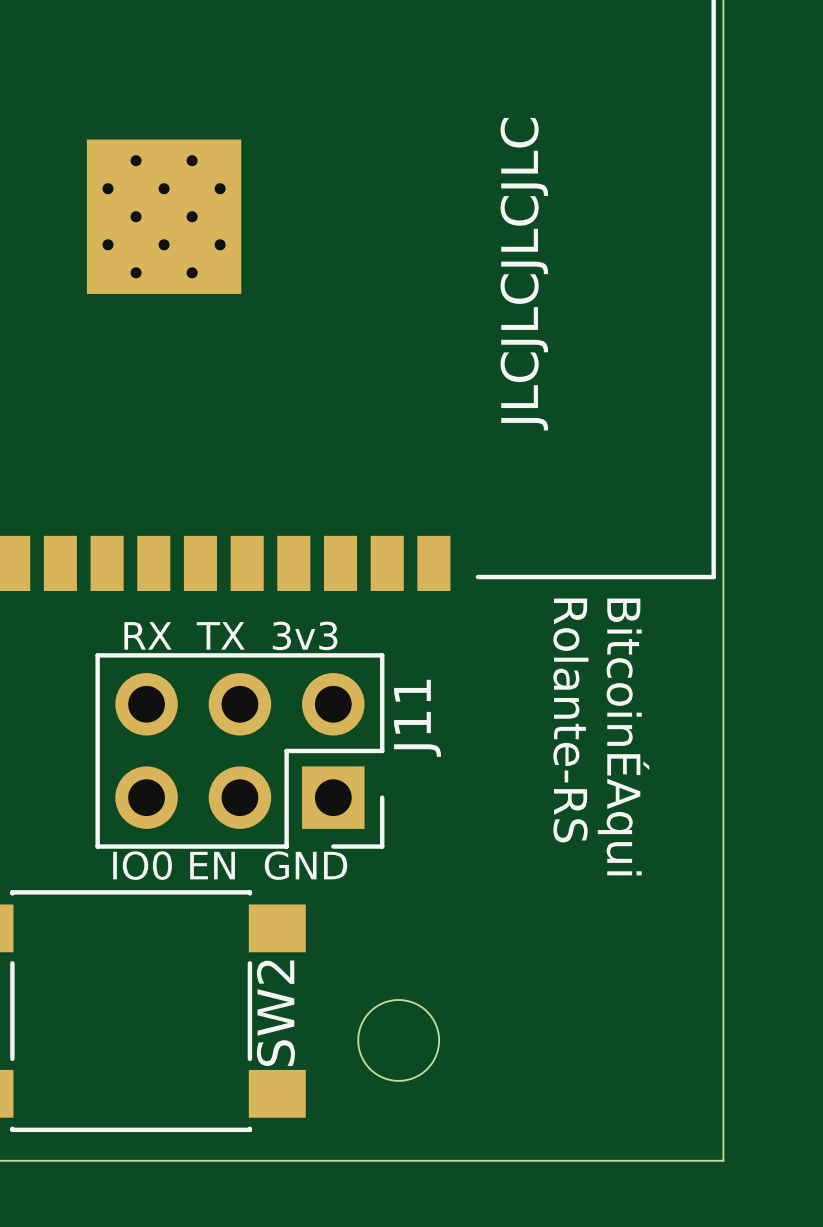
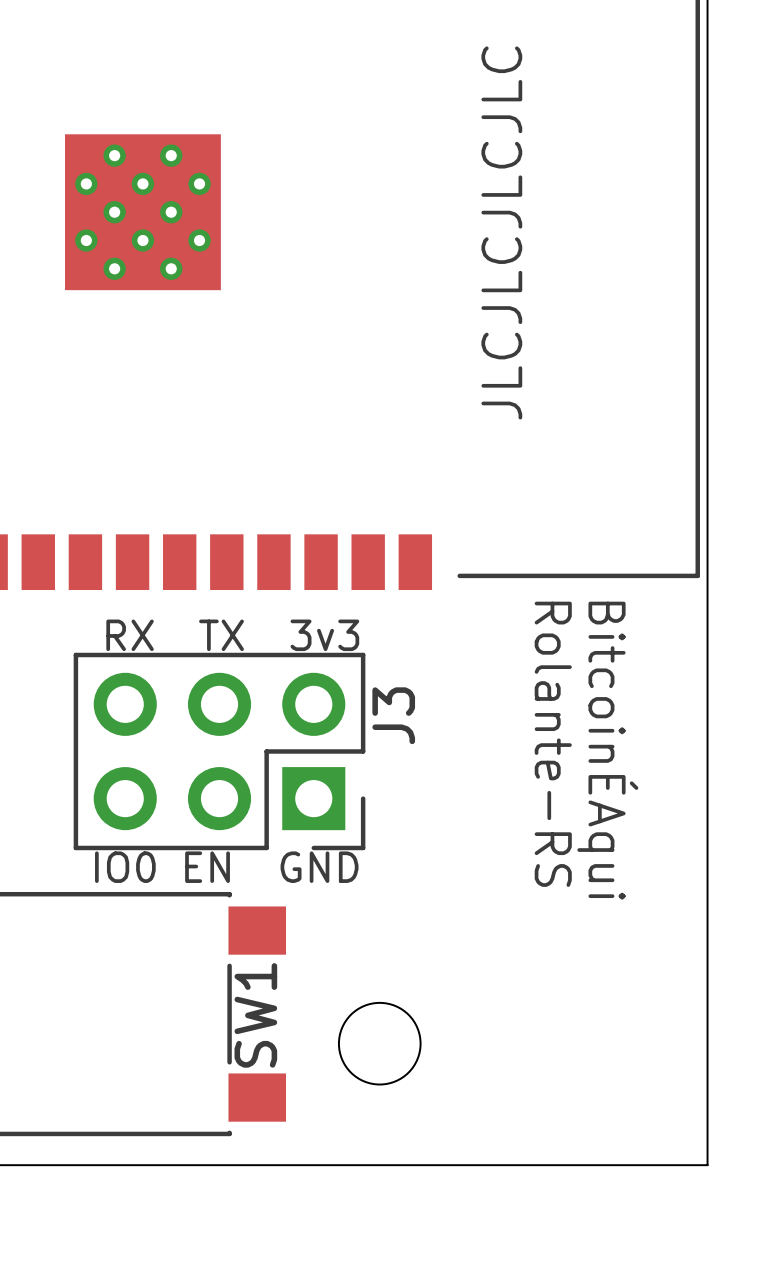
J11 name: J11 (417, 718) -> J3 (393, 715)
SW2 name: SW2 (275, 1013) -> SW1 (255, 1015)

